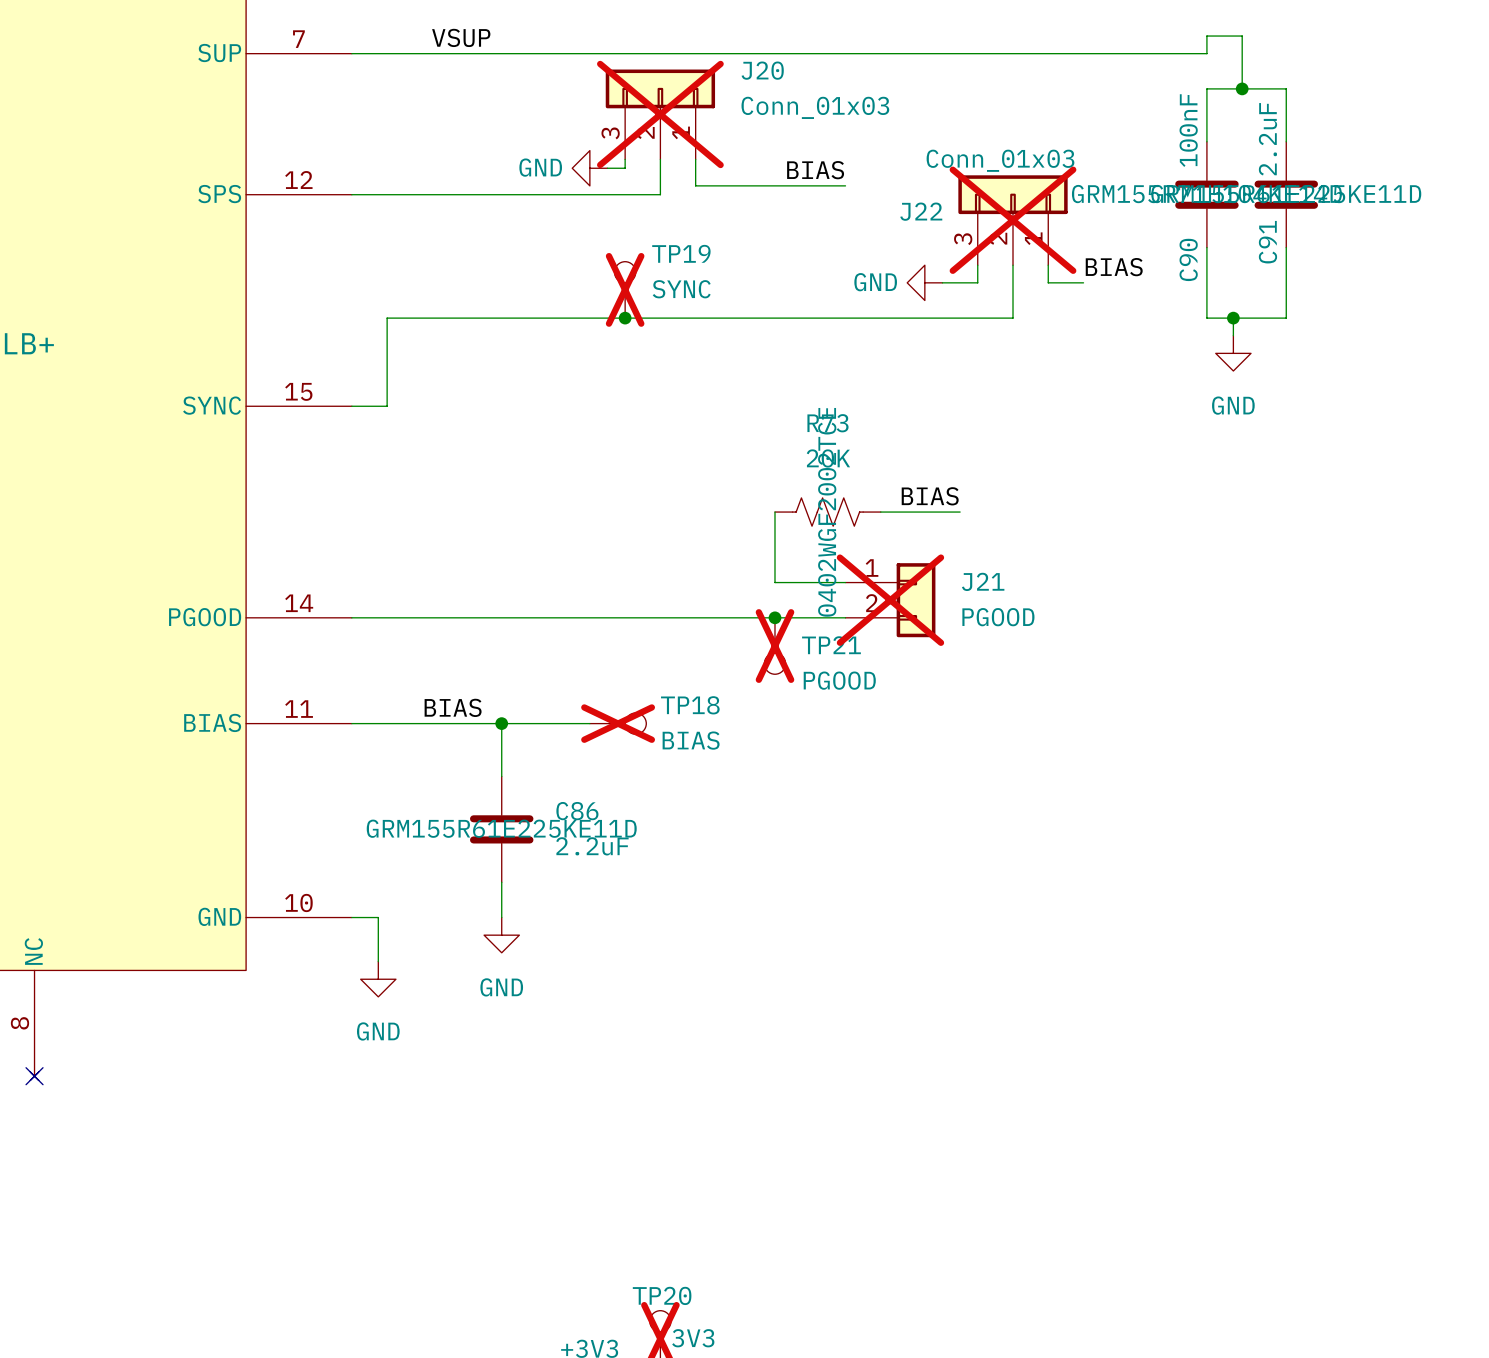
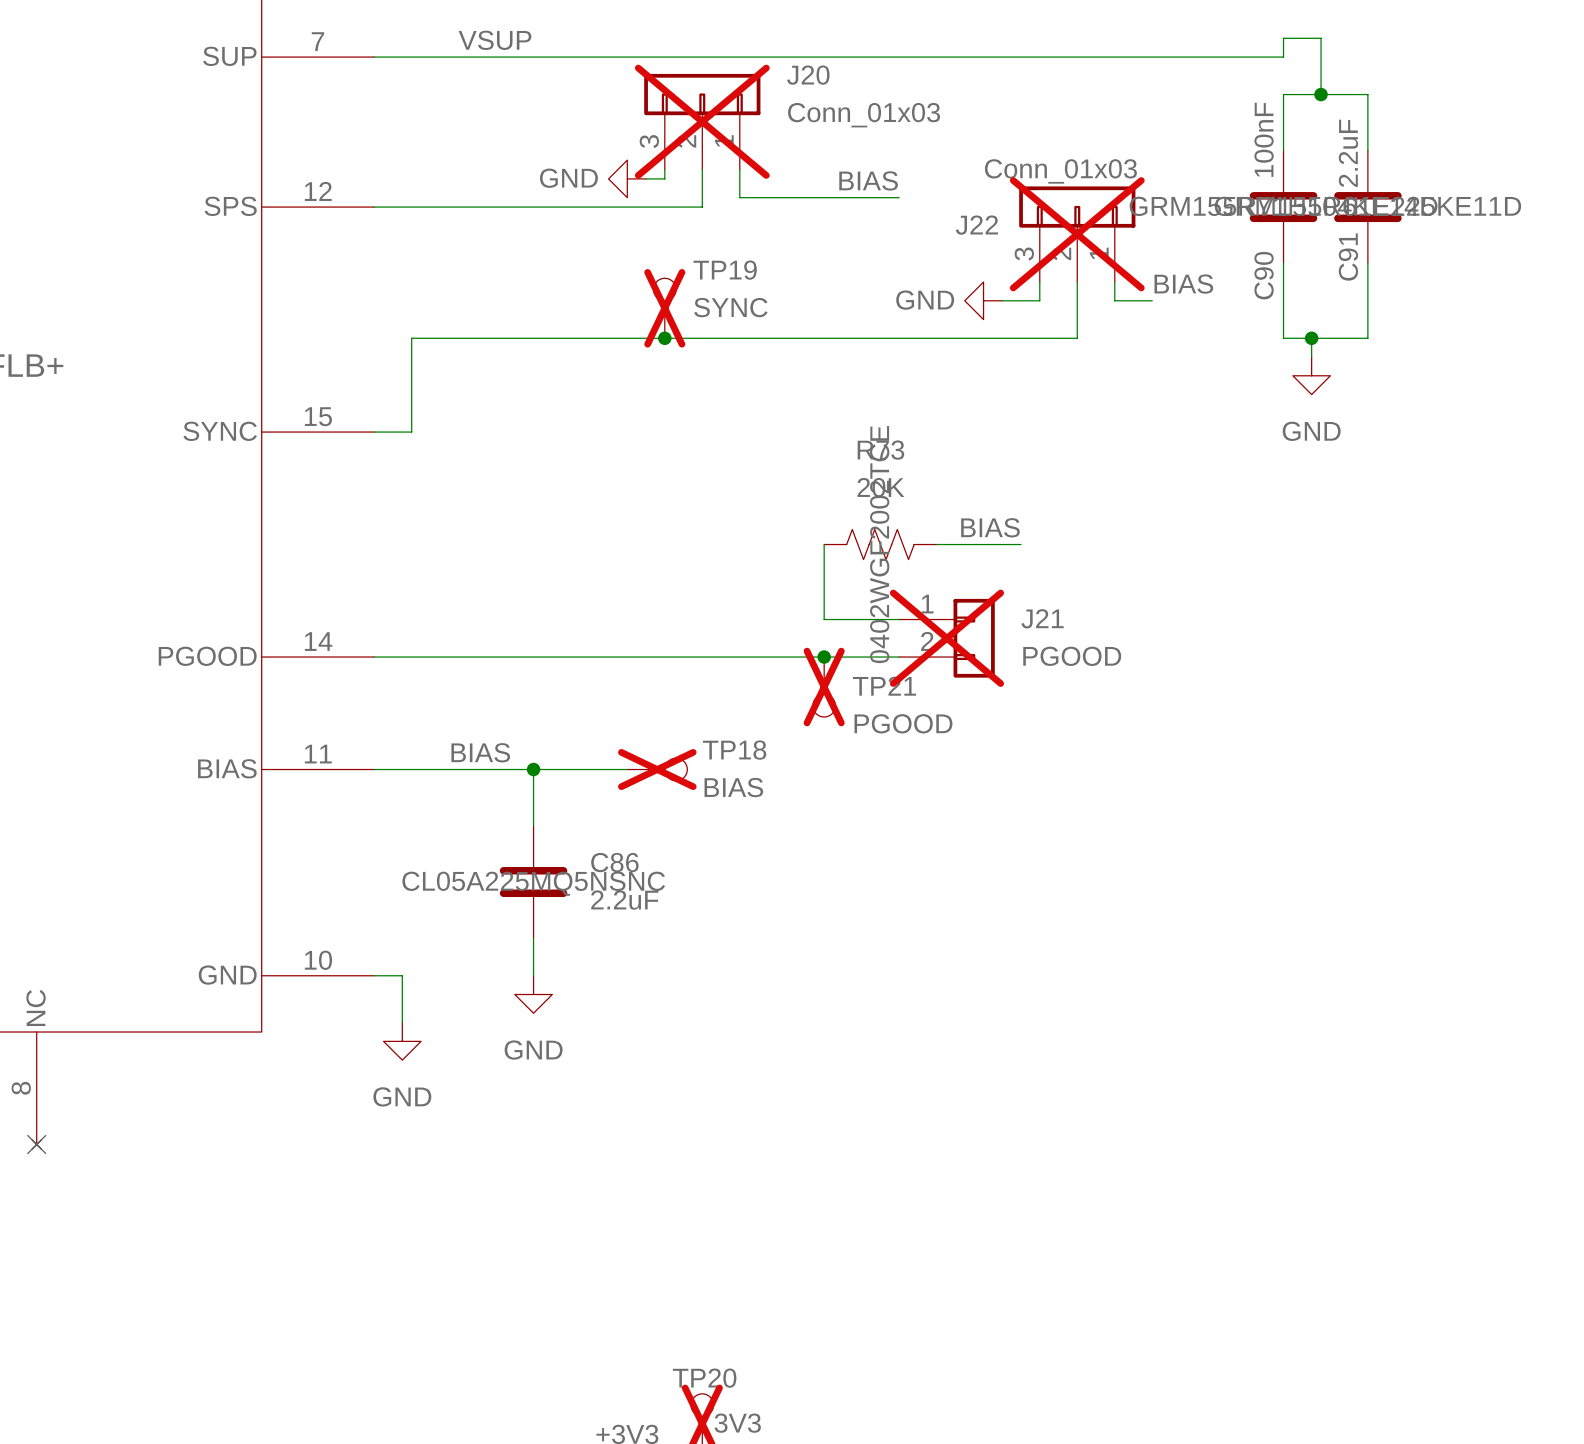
C86 text: GRM155R61E225KE11D (501, 828) -> CL05A225MQ5NSNC (533, 883)

